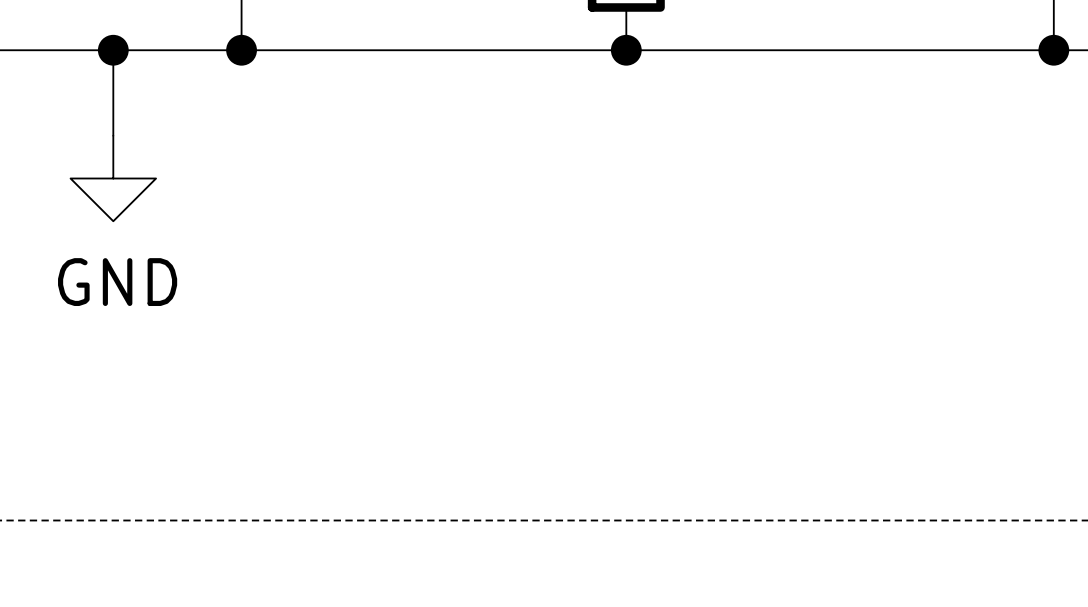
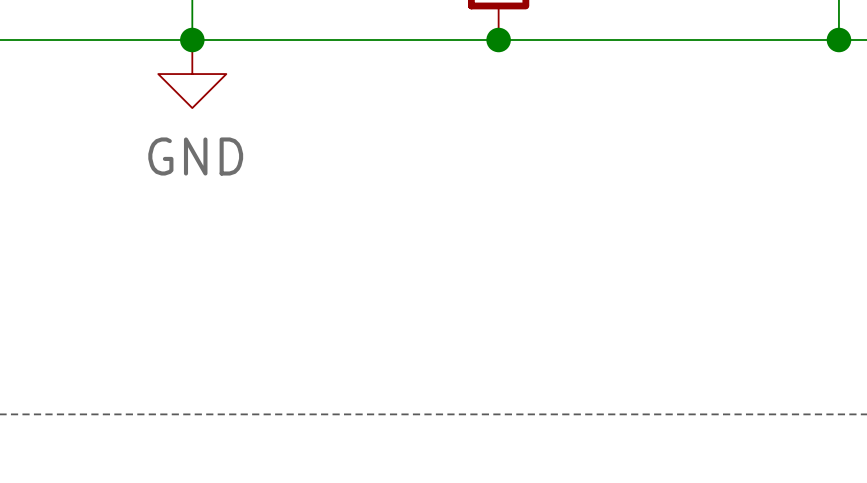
wire: (113, 50) (113, 135) -> none
junction: (113, 50) -> none
power symbol position: GND (113, 178) -> GND (192, 74)

